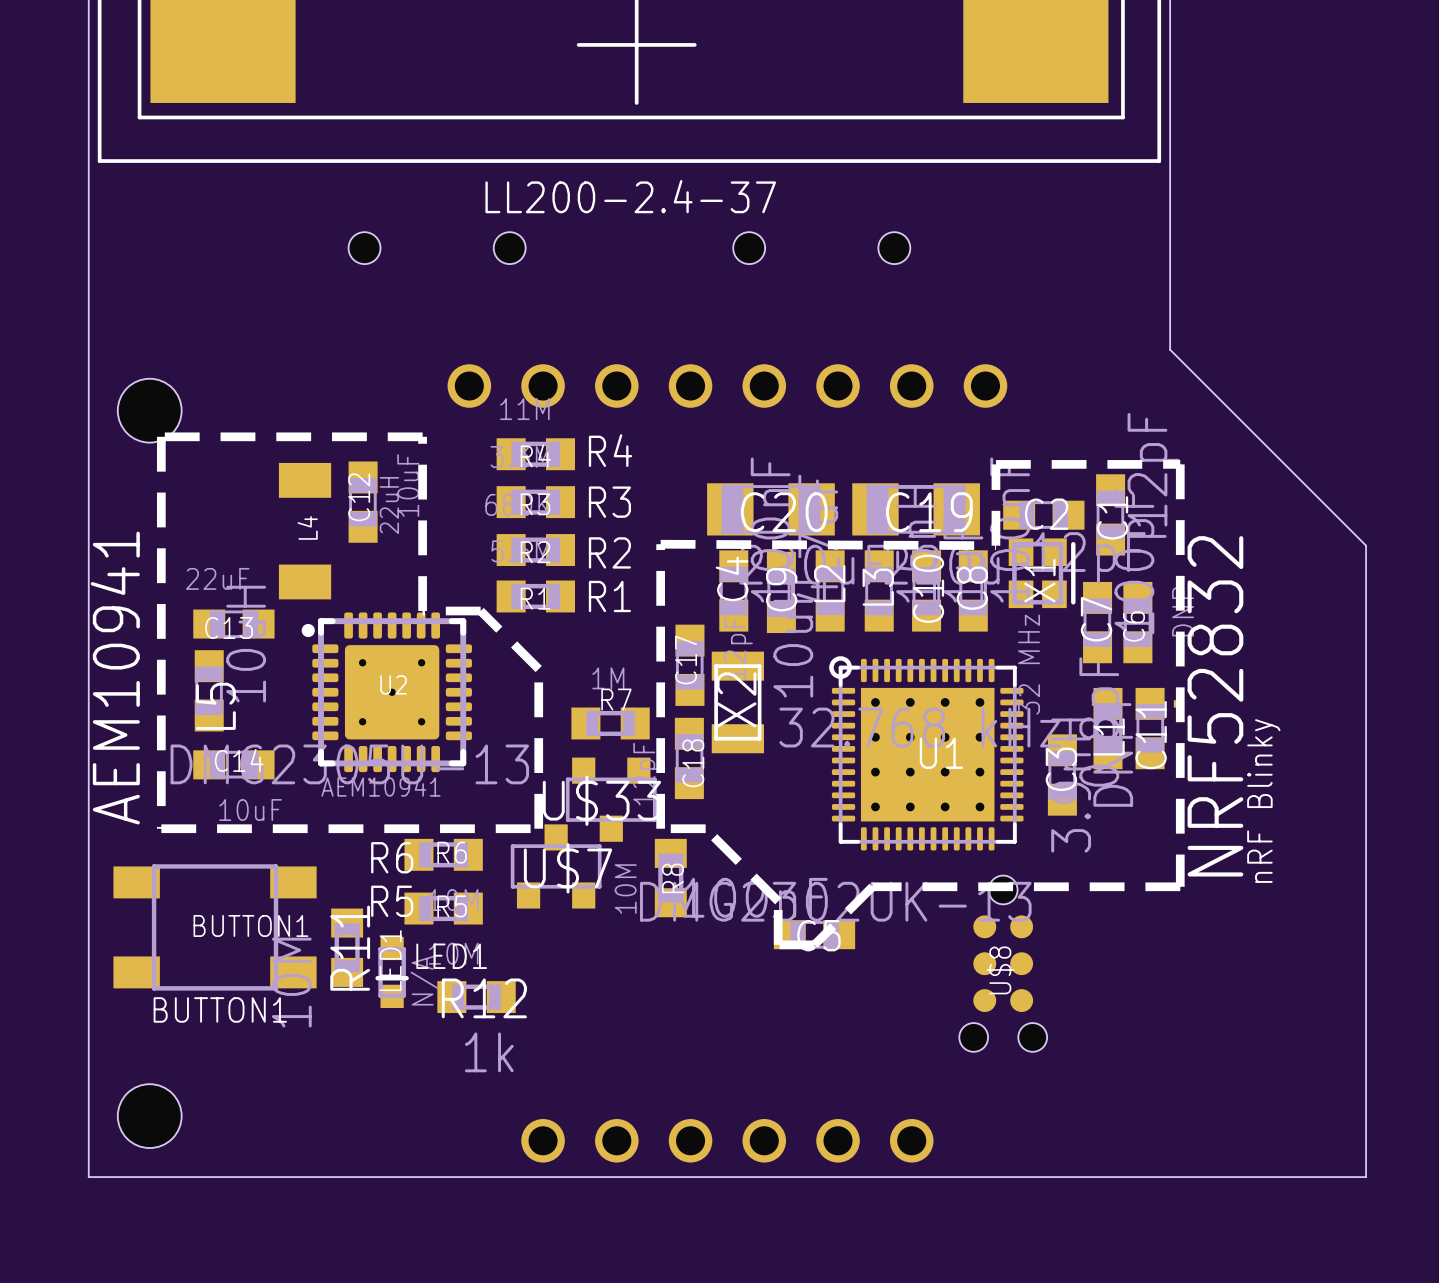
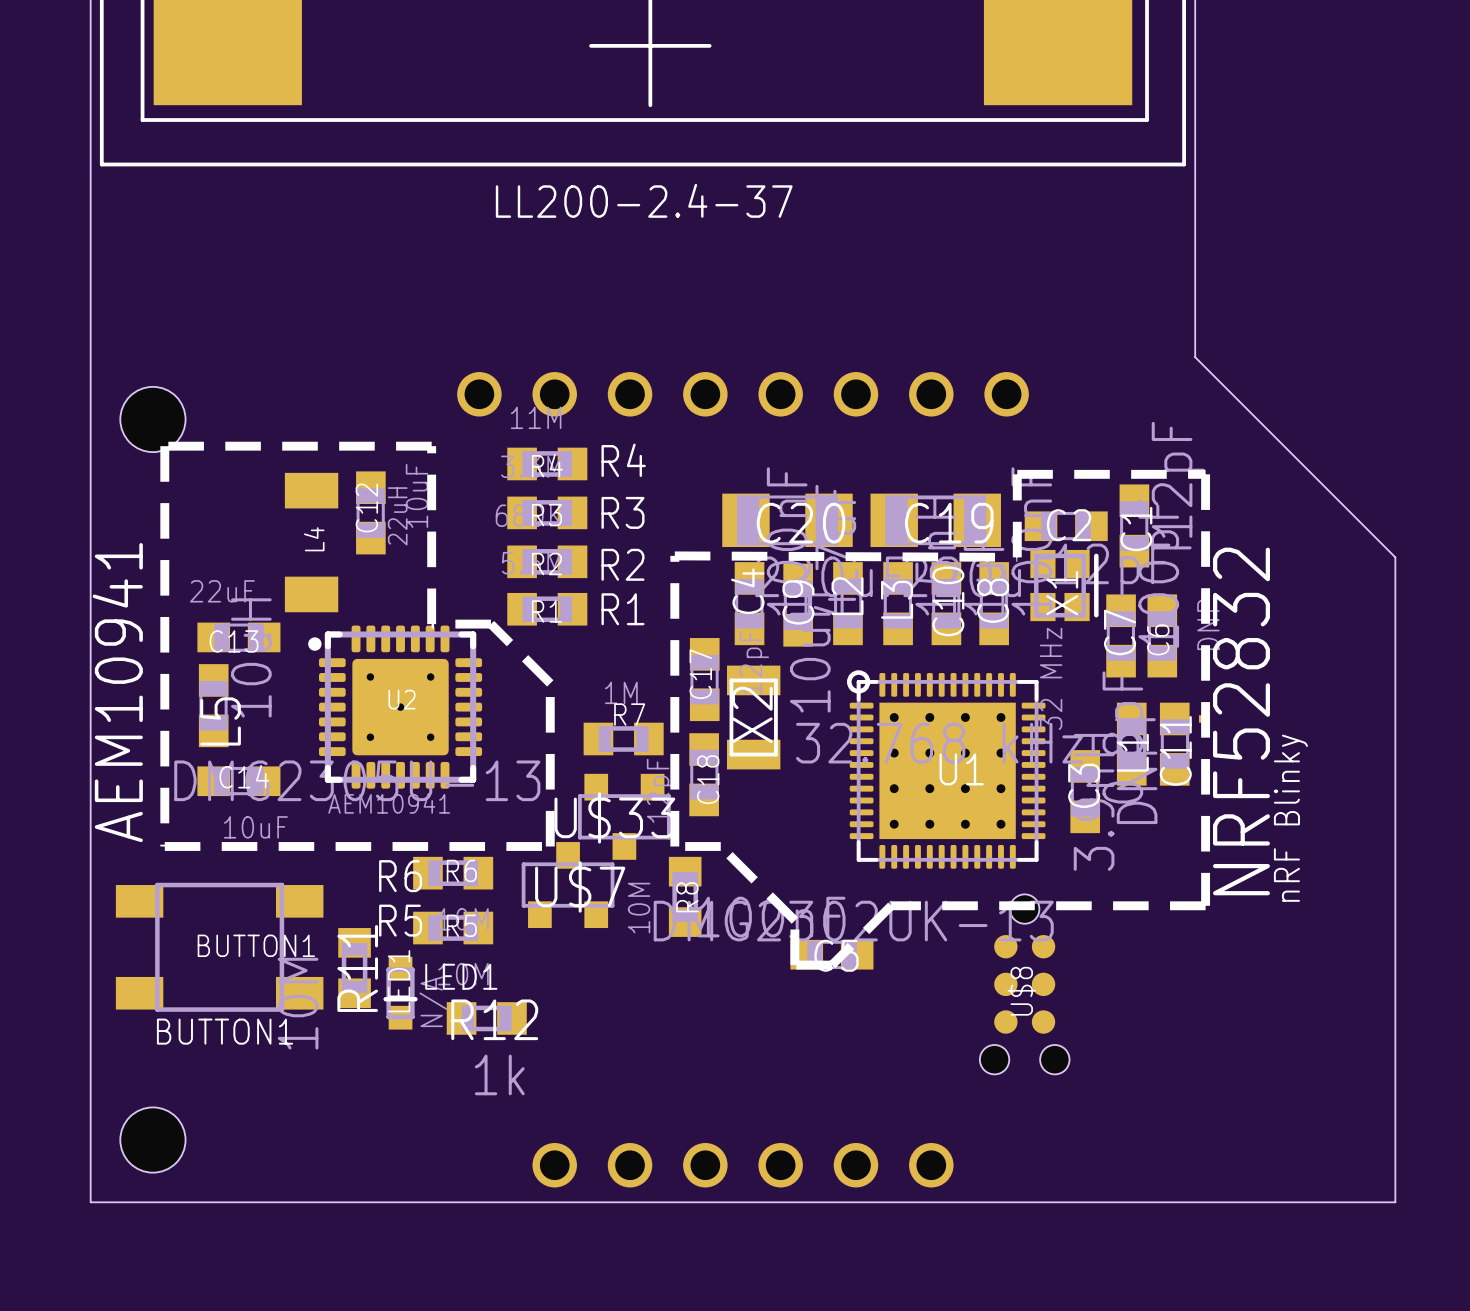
hole: (364, 248) -> none
hole: (509, 248) -> none
hole: (749, 248) -> none
hole: (894, 248) -> none

